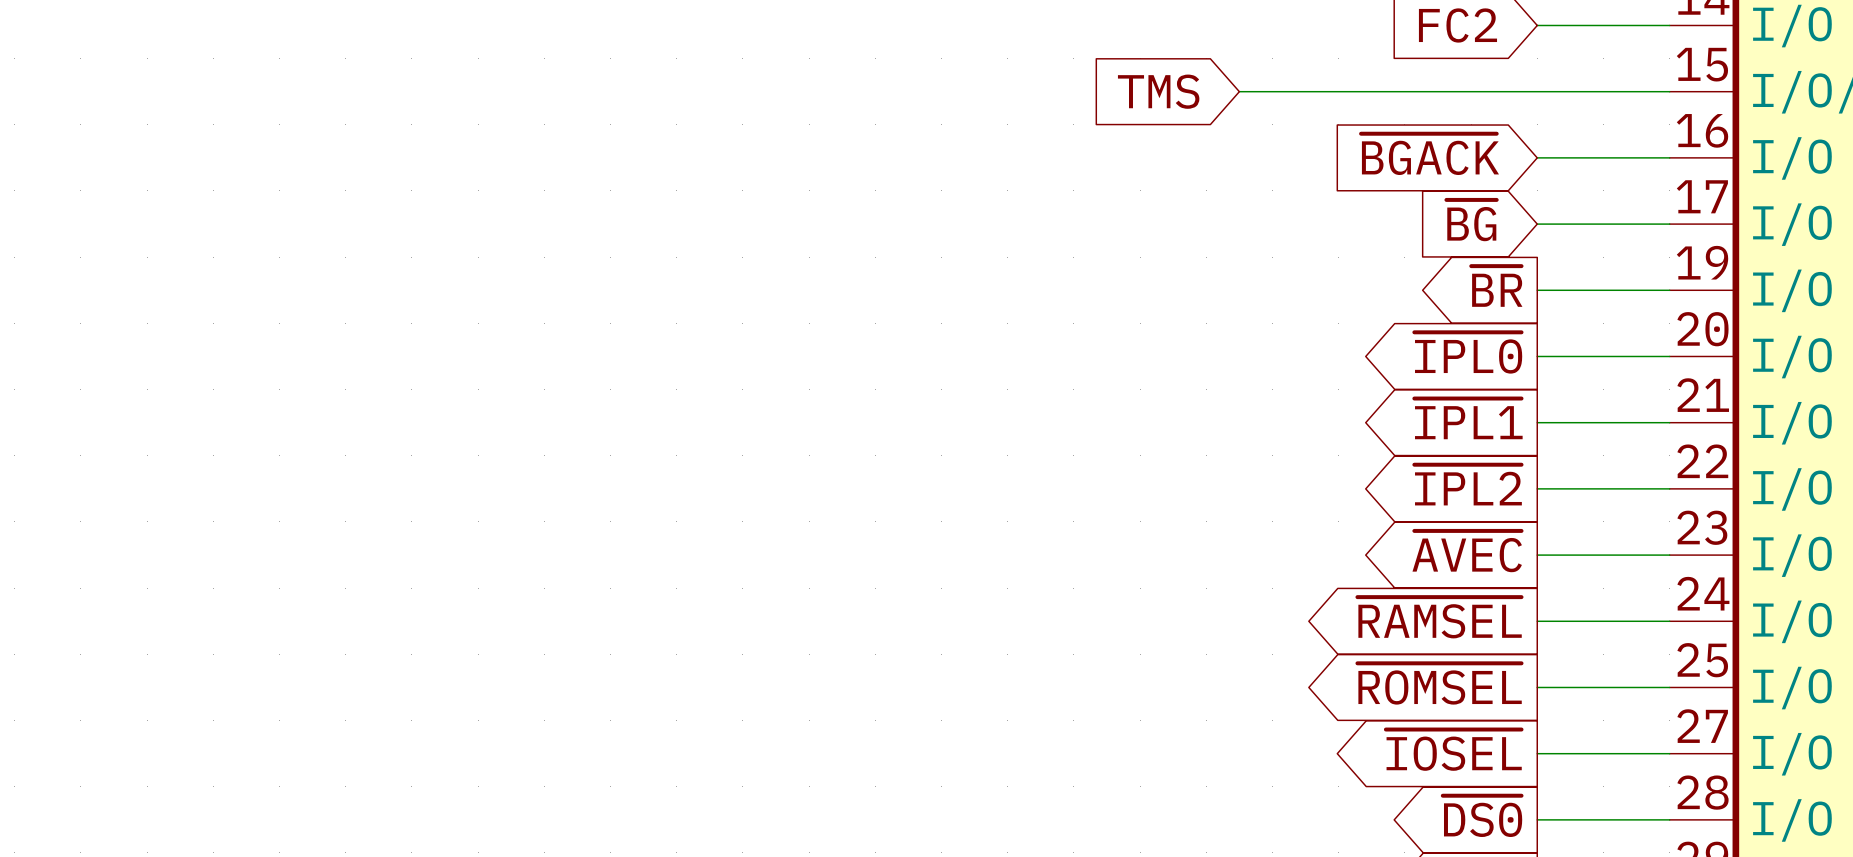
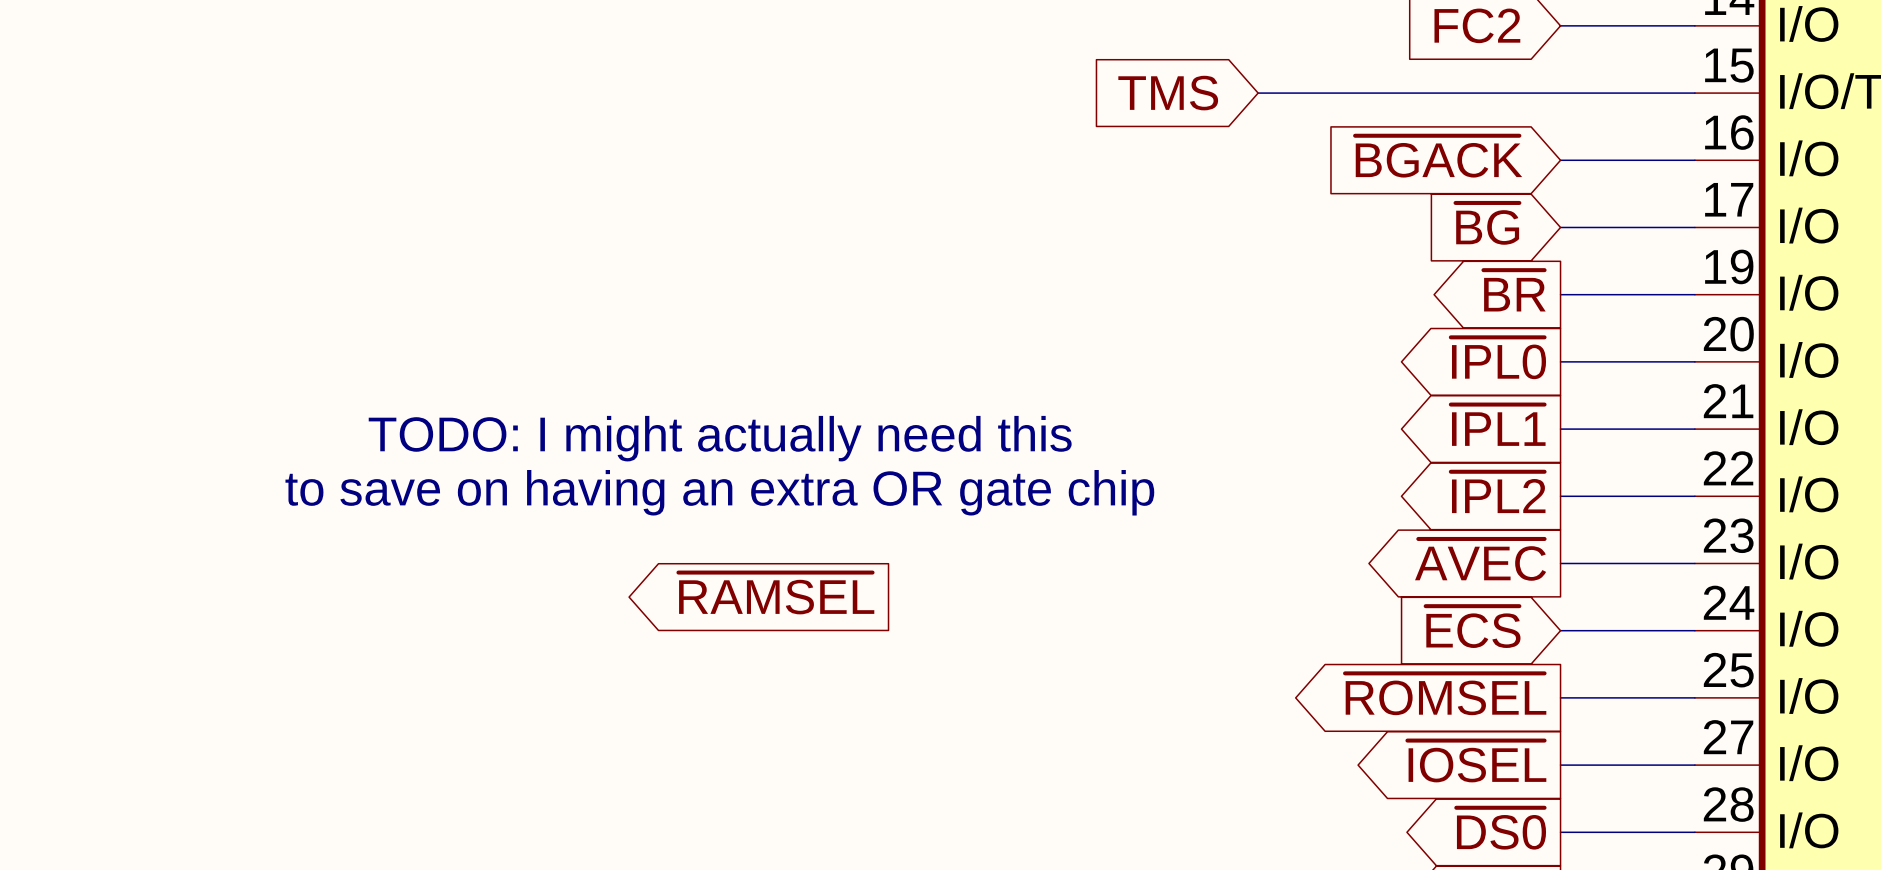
text: none -> TODO: I might actually need this (720, 438)
text: none -> to save on having an extra OR gate chip (719, 492)
global label: none -> ~{RAMSEL} (776, 593)
global label shape: output (1439, 617) -> input (1473, 627)
global label: ~{RAMSEL} (1439, 617) -> ~{ECS} (1473, 627)

